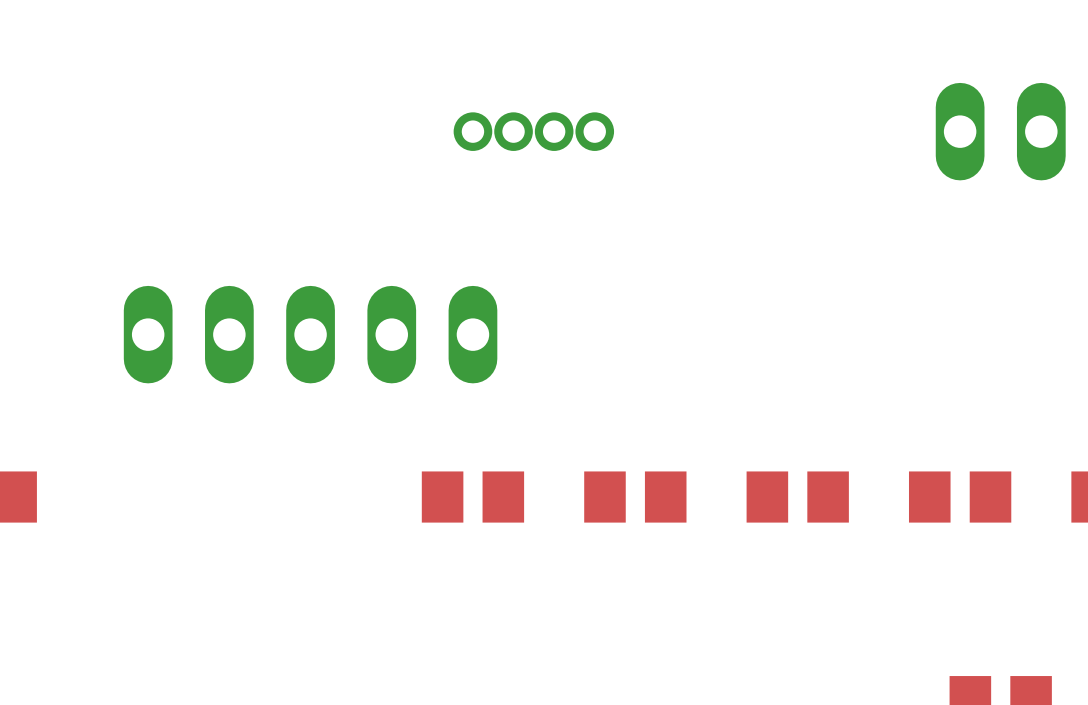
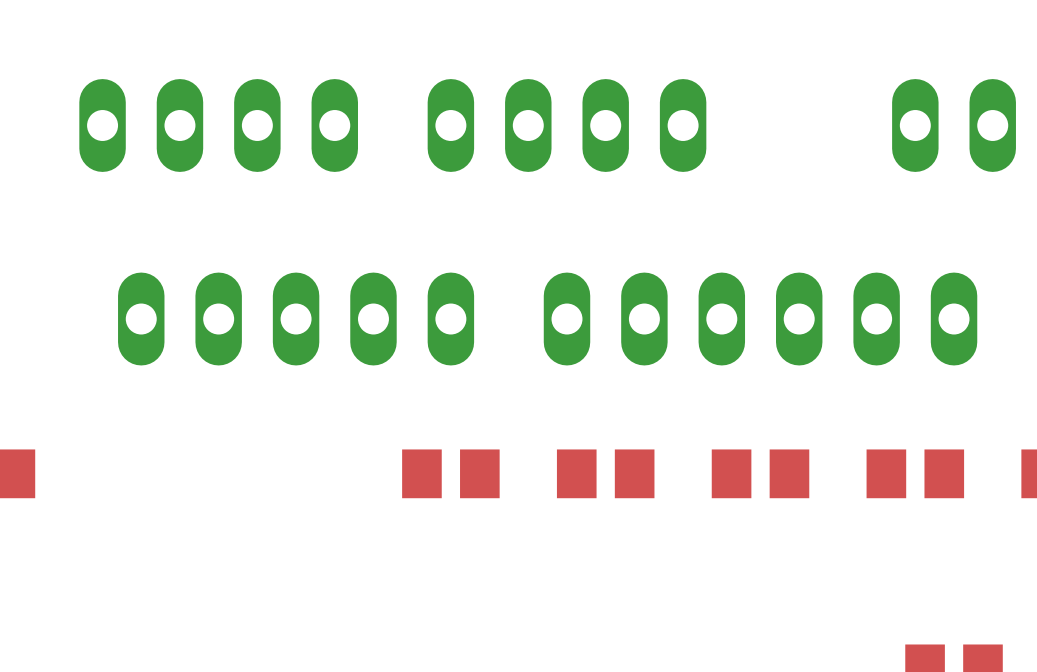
part: none -> (218, 125)
part: (533, 131) -> none
part: none -> (566, 125)
part: none -> (760, 319)

